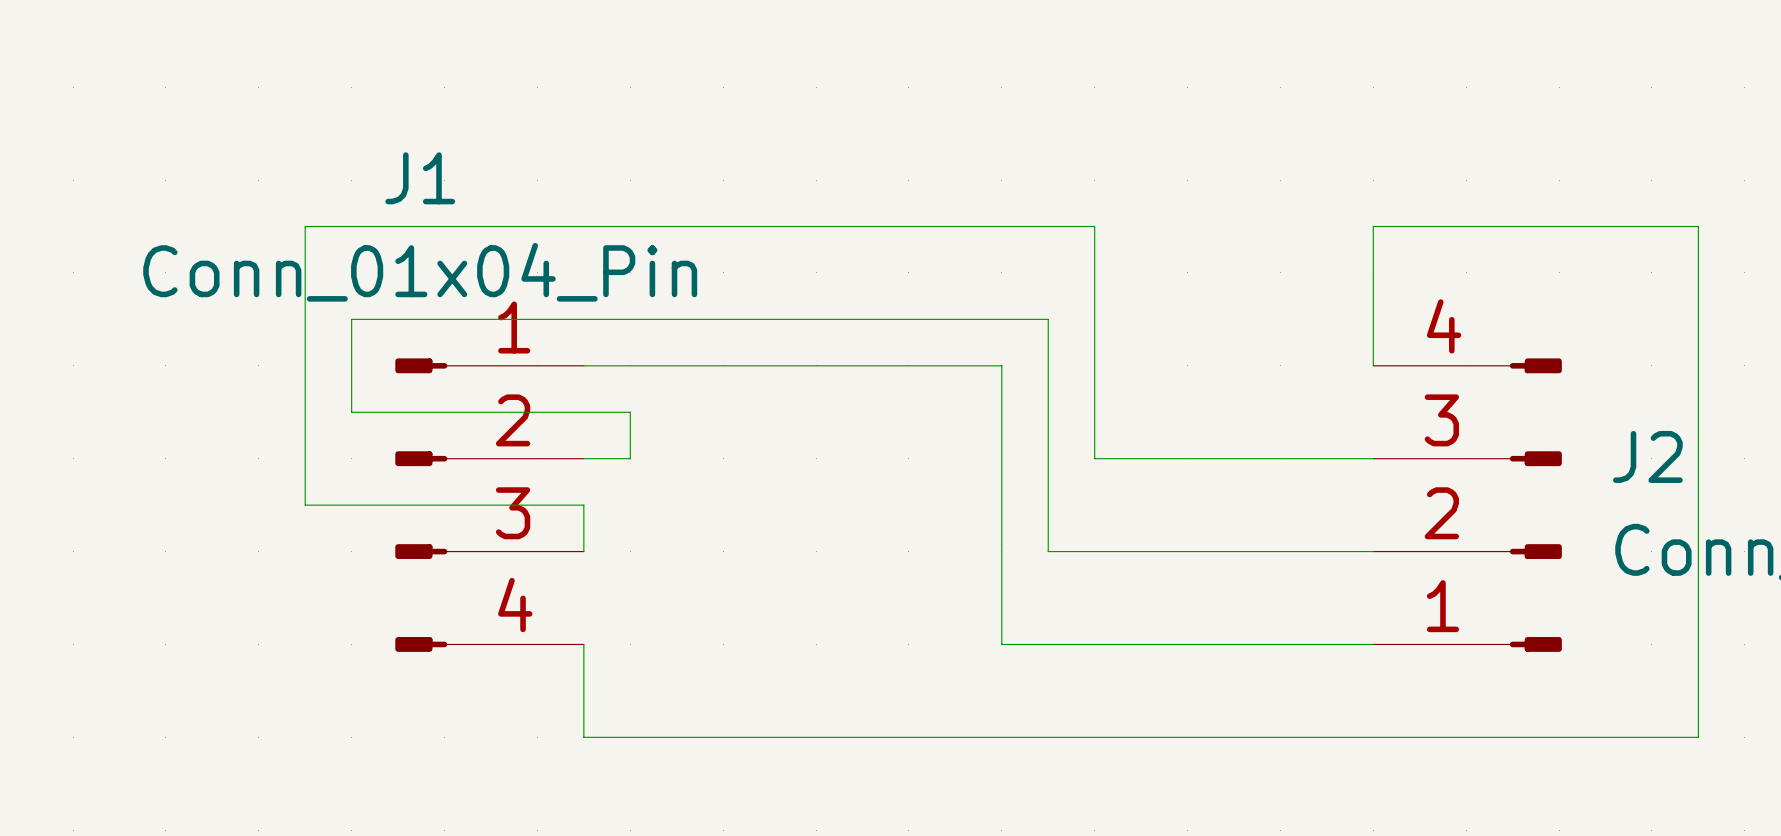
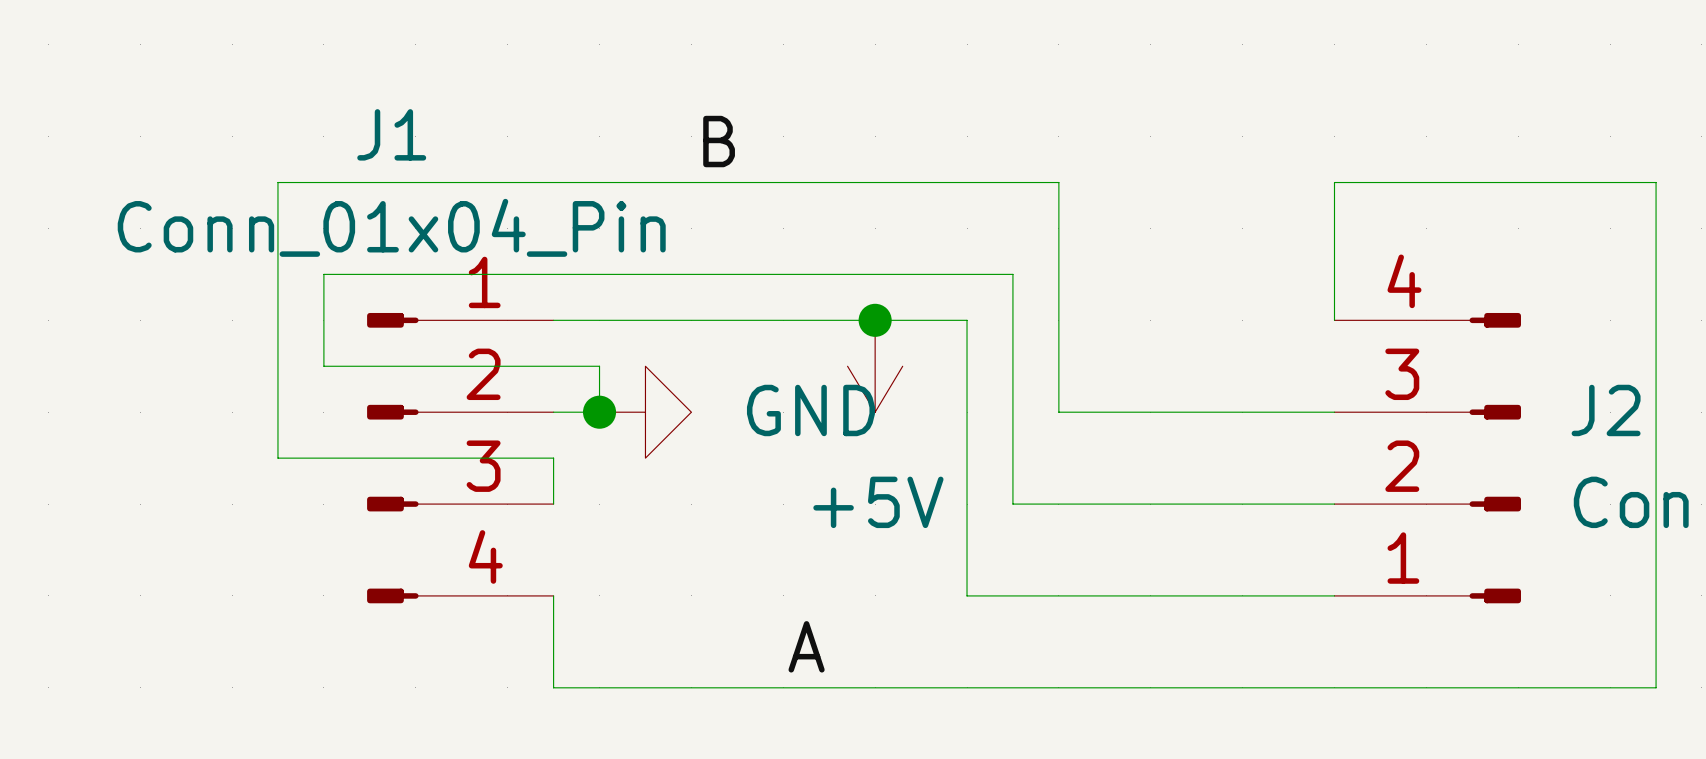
label: none -> B (719, 141)
junction: none -> (875, 320)
power symbol: none -> +5V (875, 366)
junction: none -> (599, 412)
power symbol: none -> GND (645, 412)
label: none -> A (806, 646)

